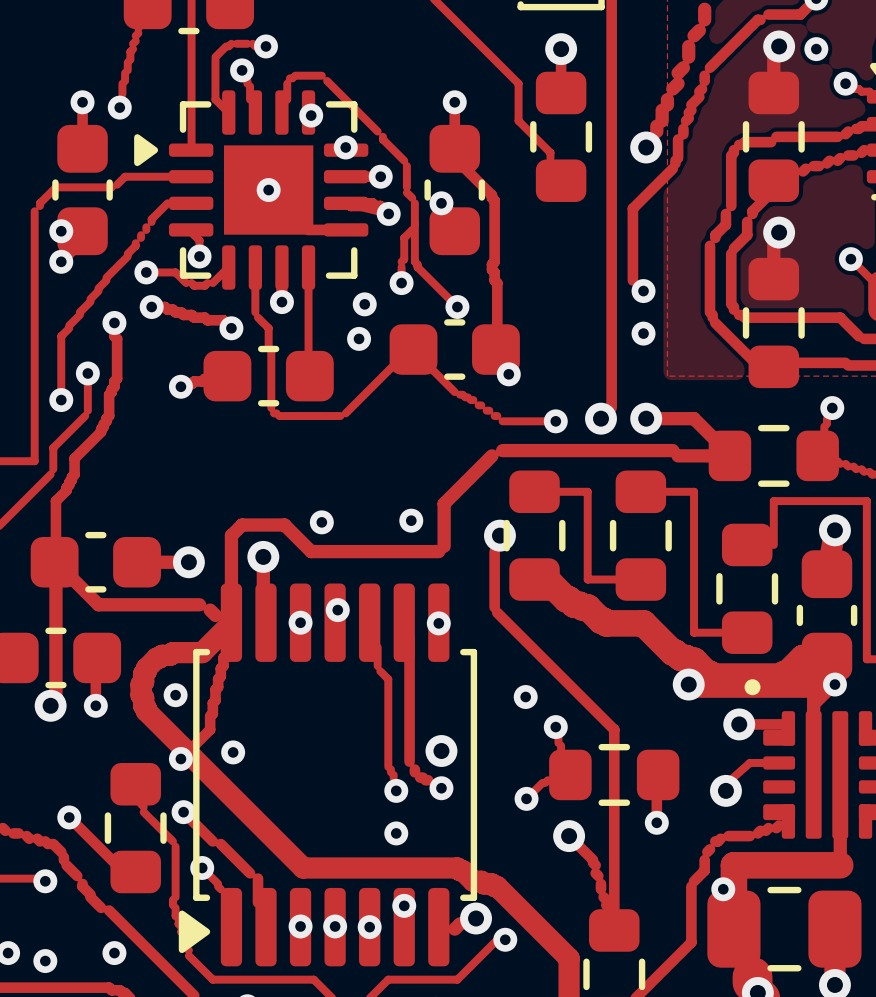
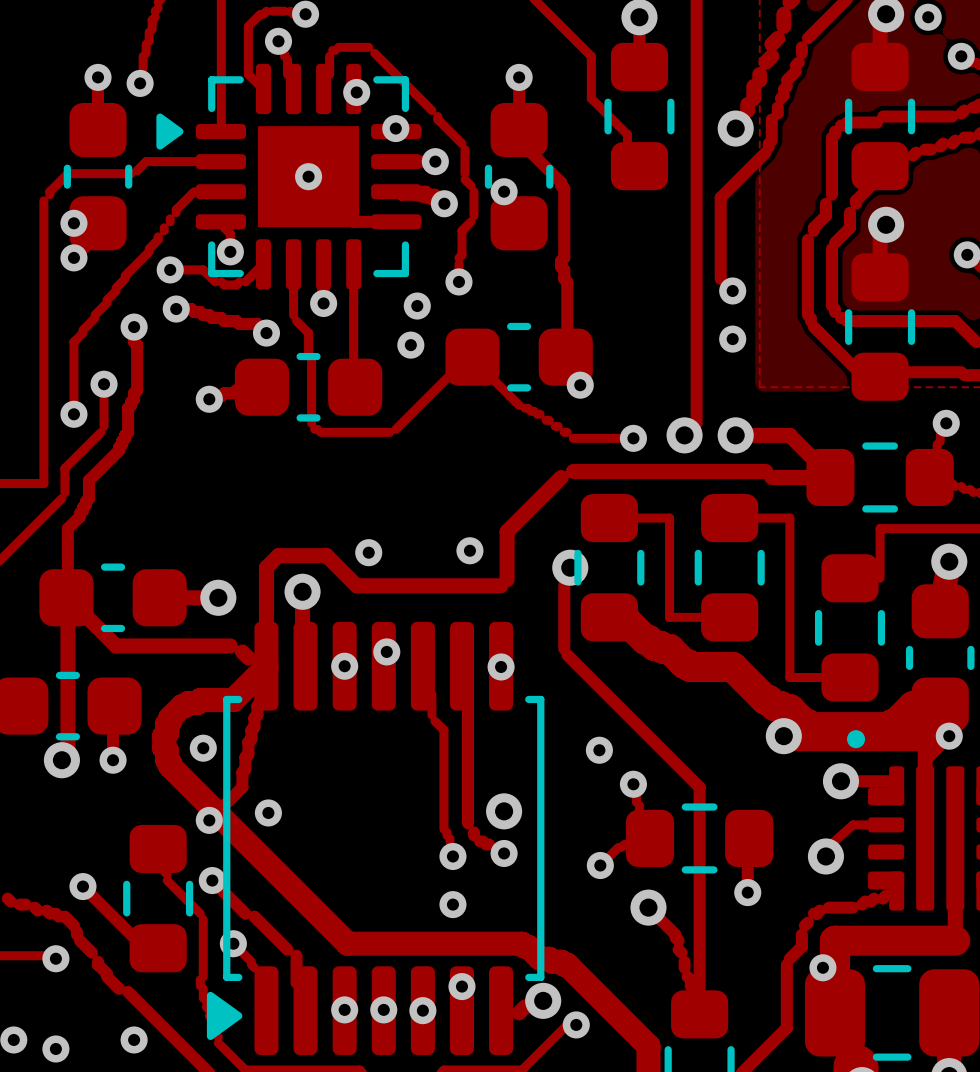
track: (414, 224) (414, 261) (417, 267) (457, 307) -> none
via: (457, 307) -> none

